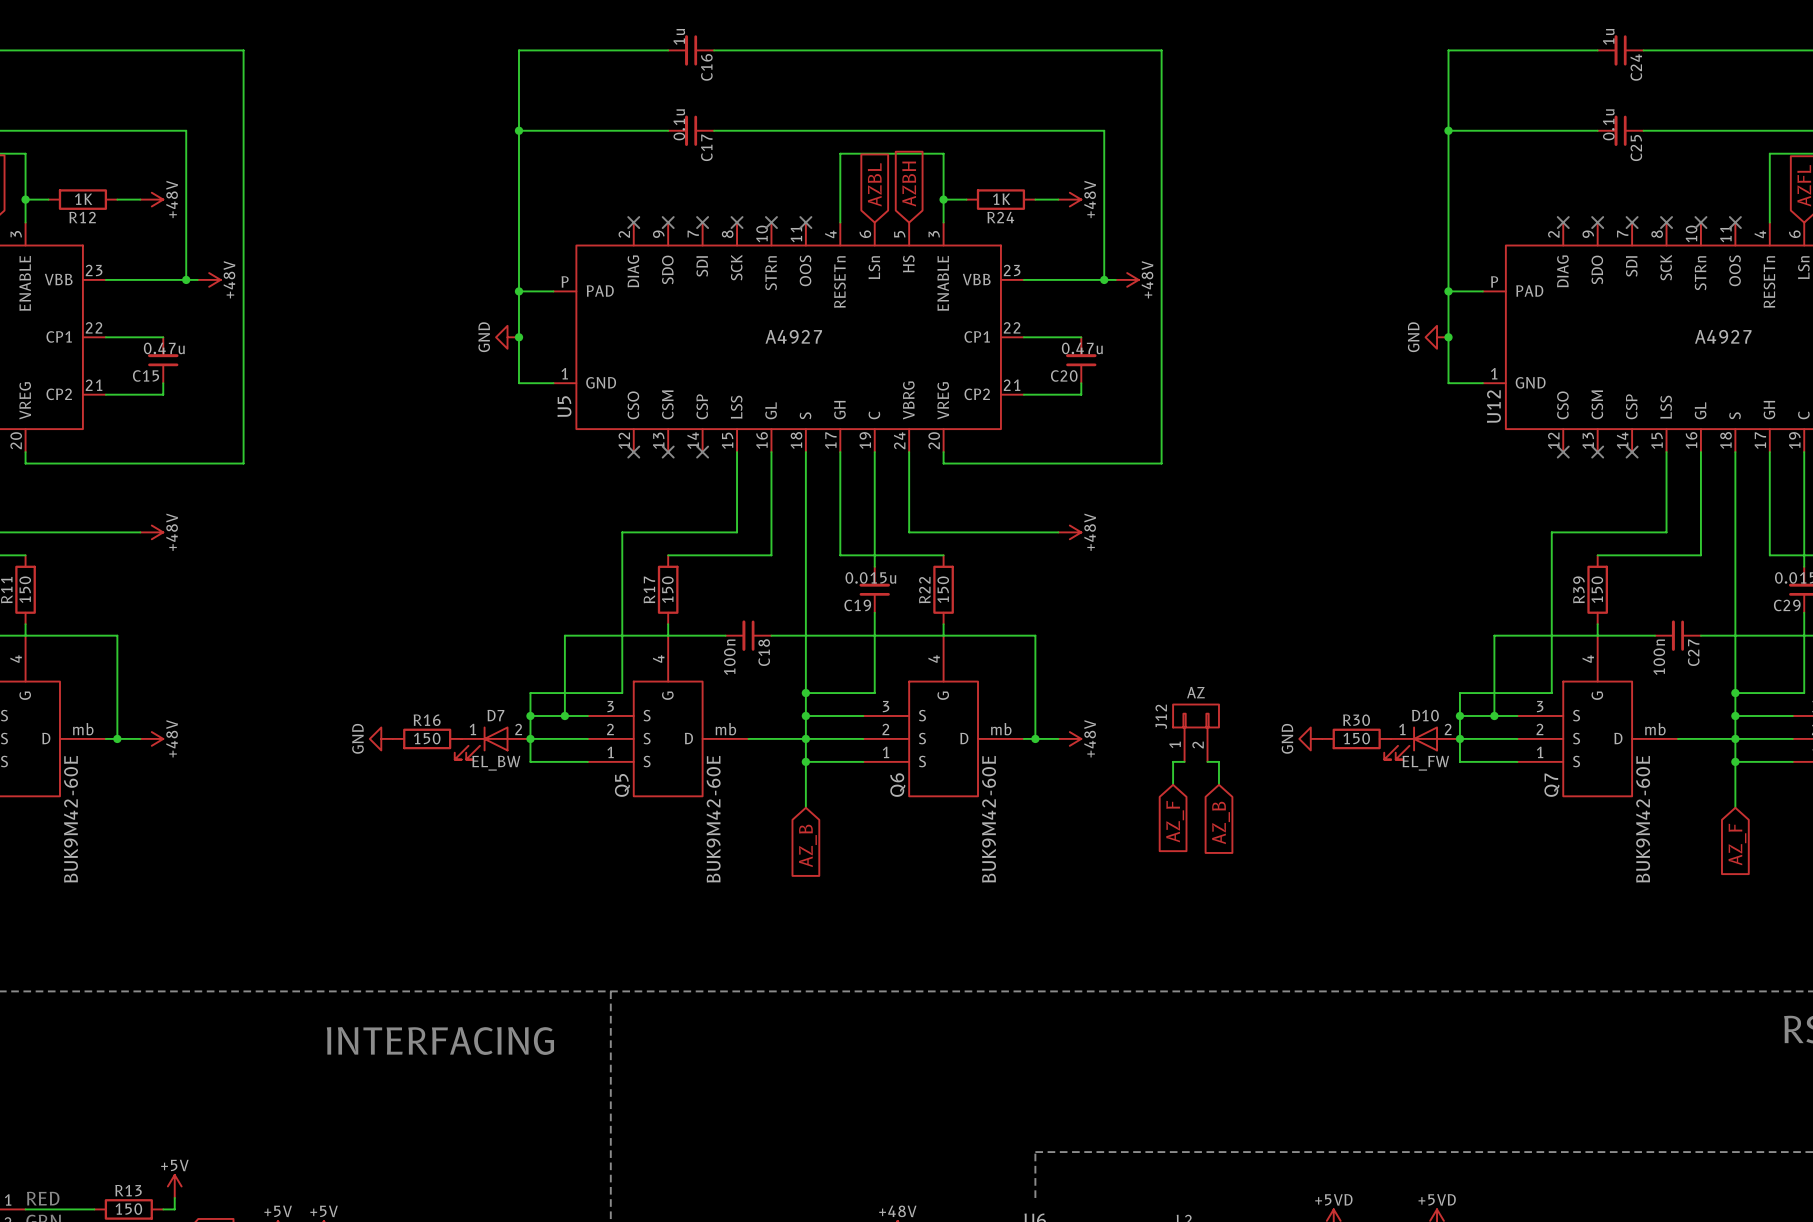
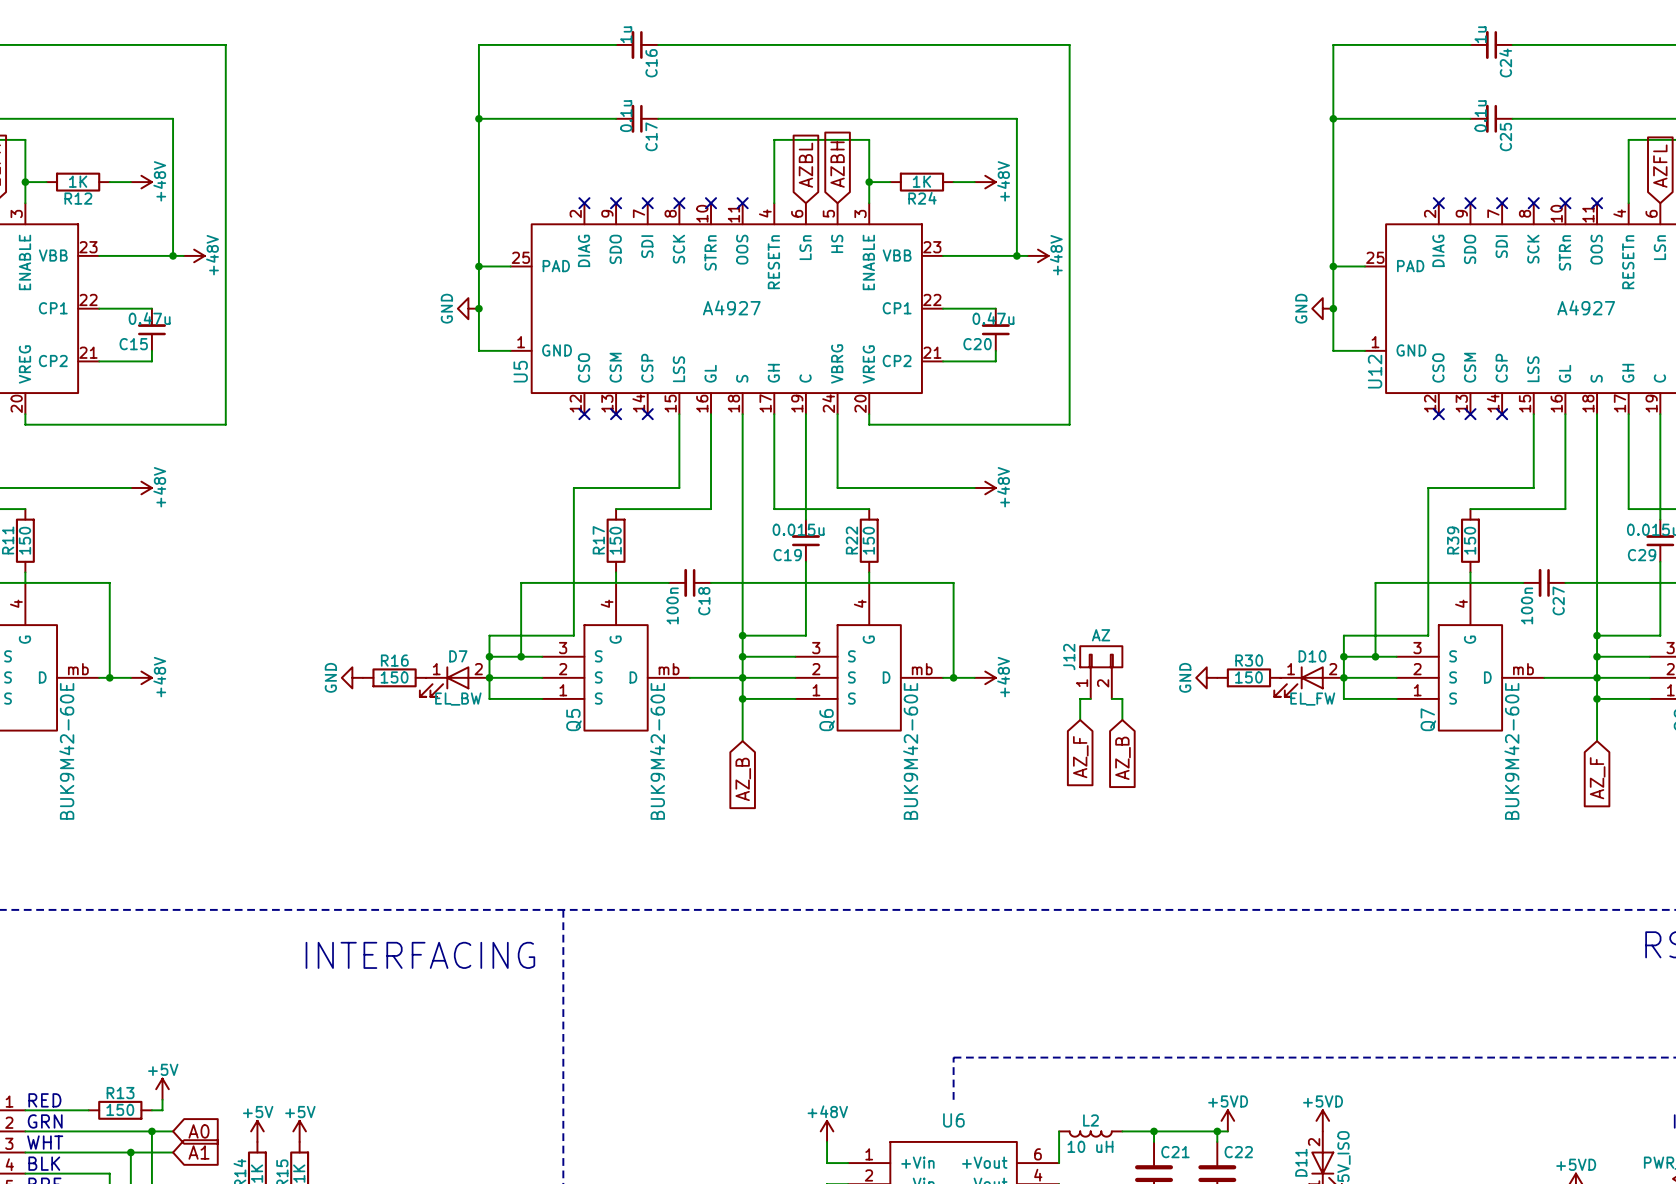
U5 pin number: P (565, 281) -> 25 (520, 257)
U12 pin number: P (1494, 281) -> 25 (1375, 257)

